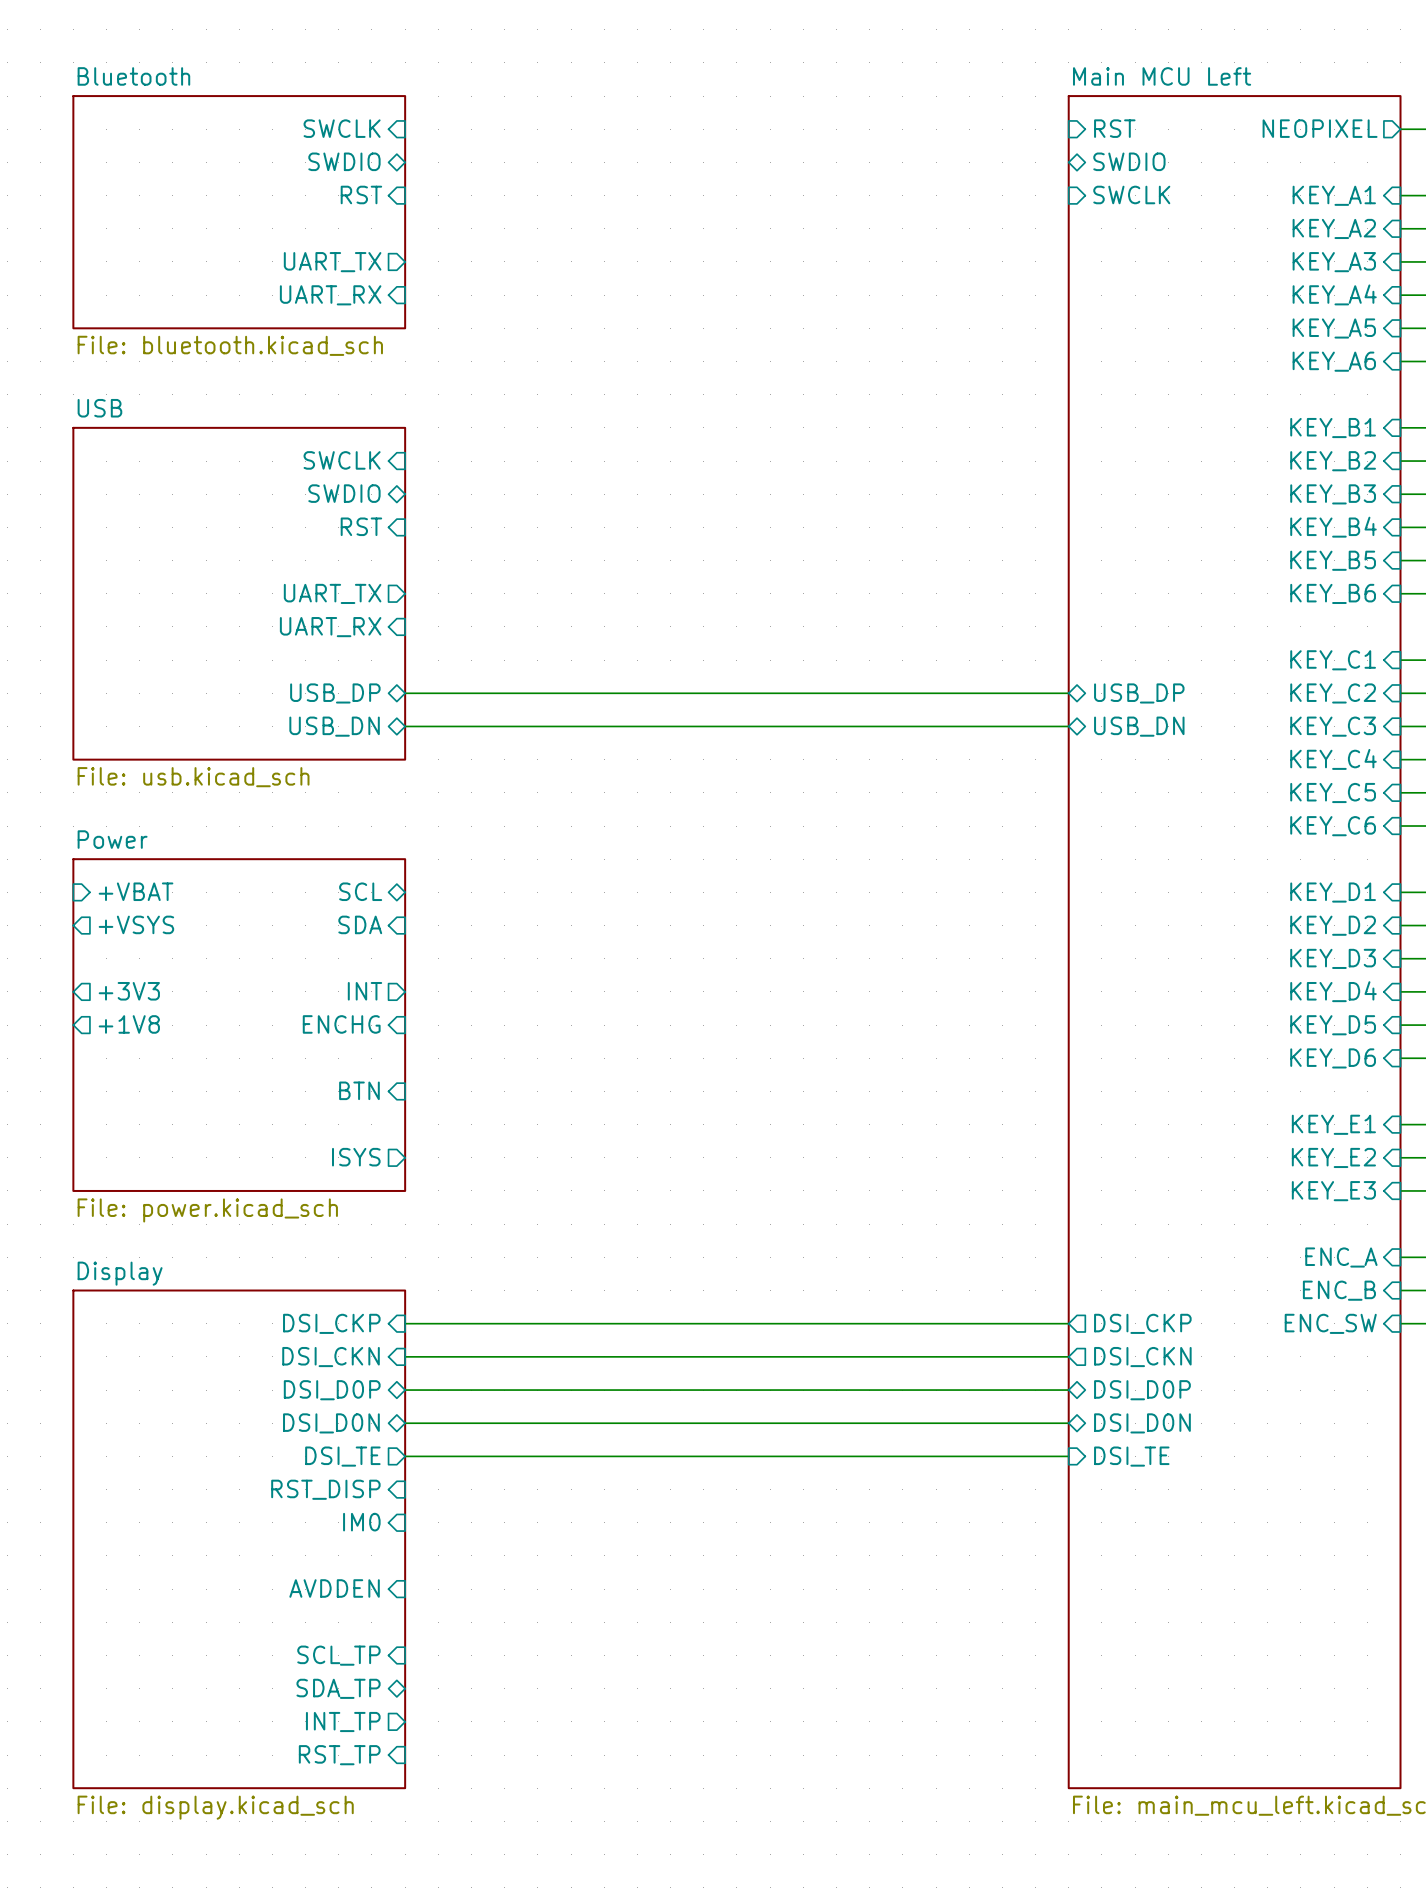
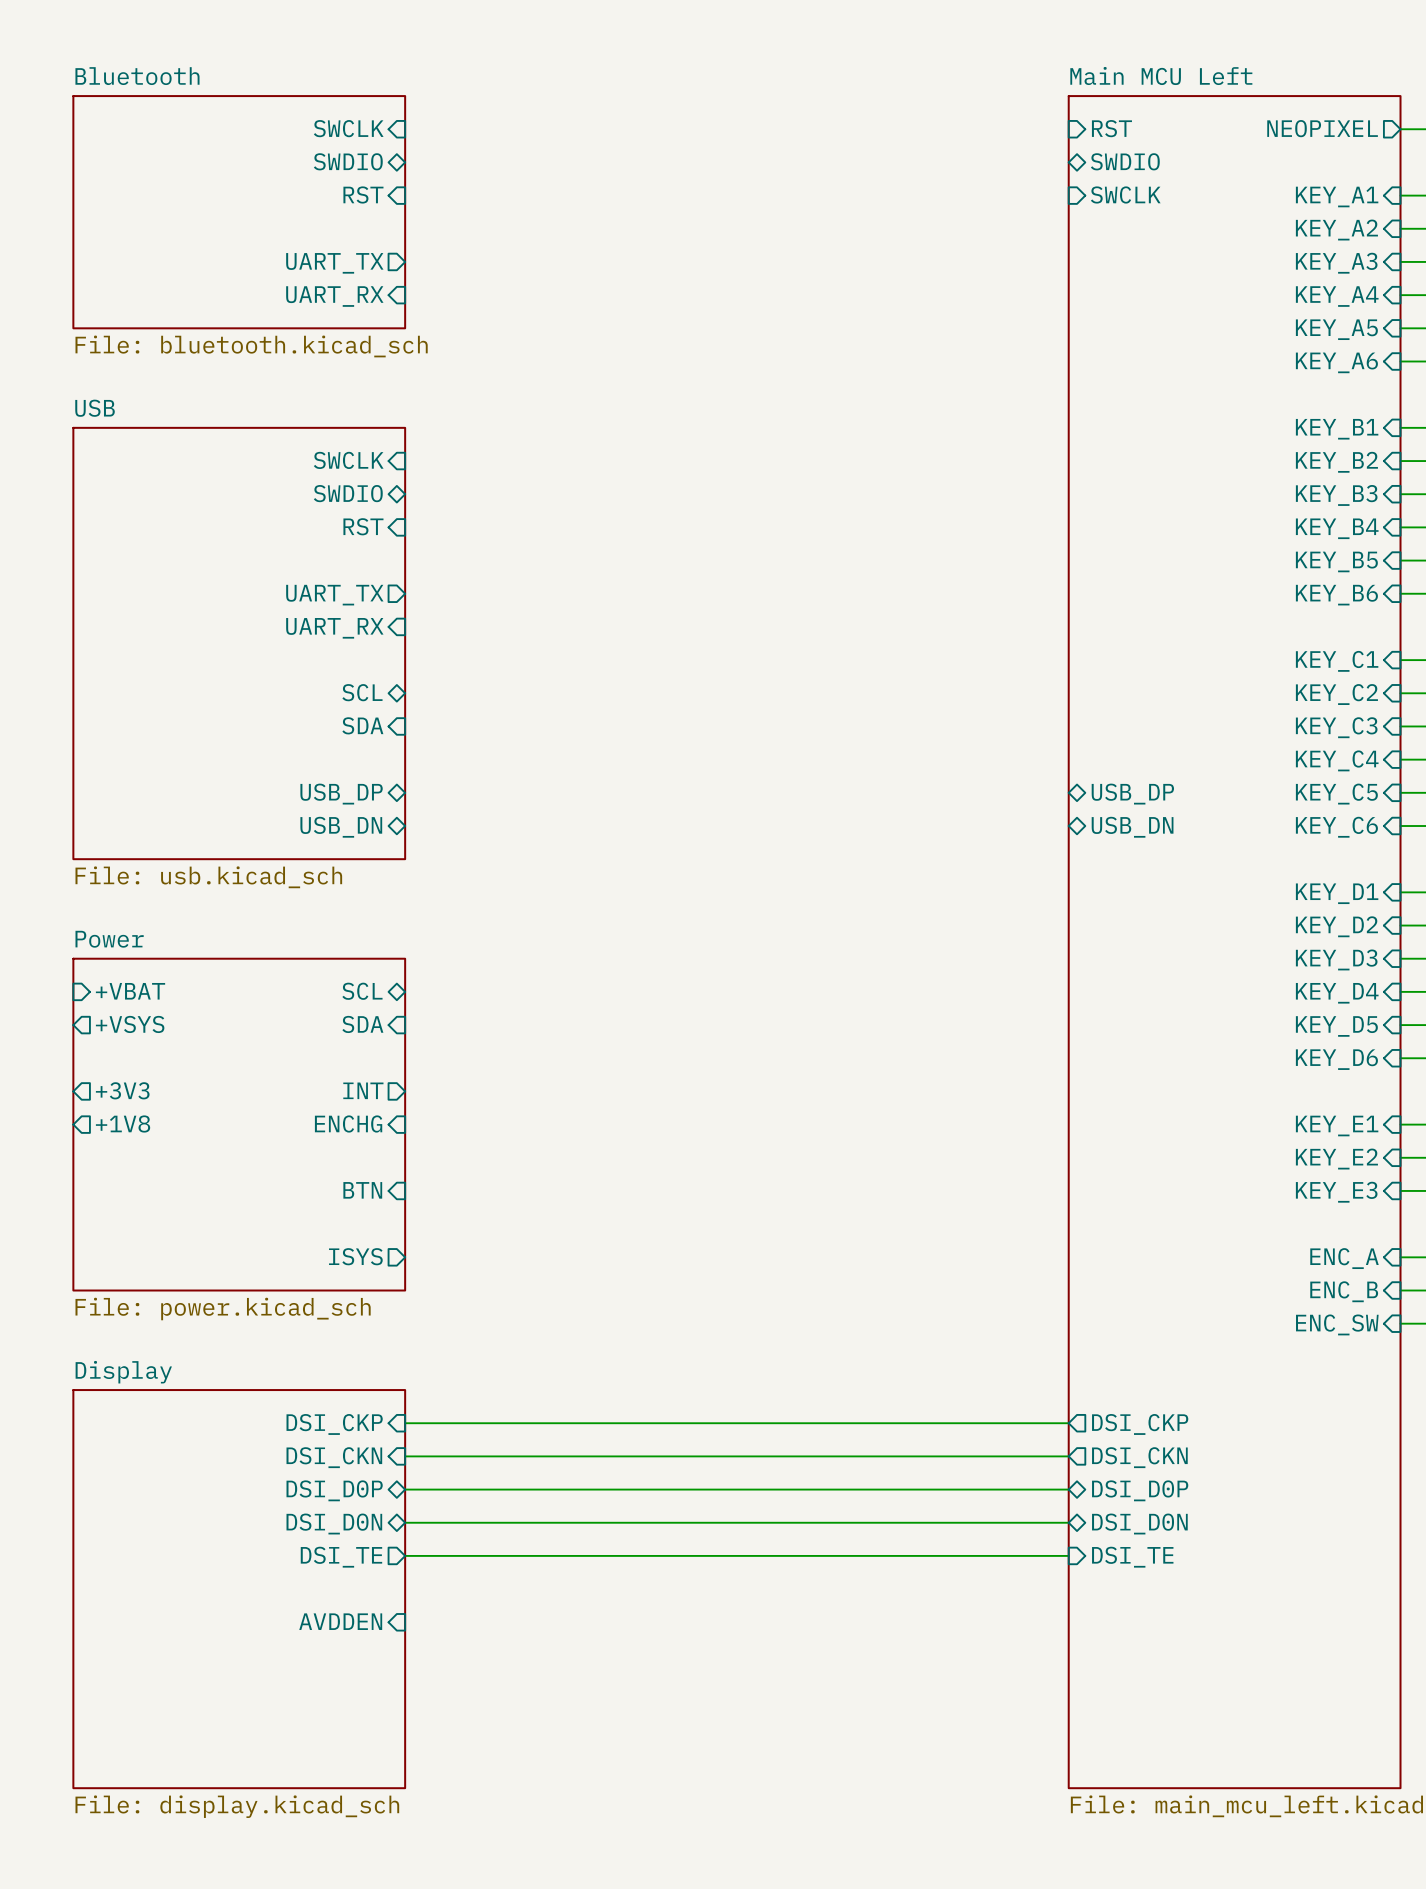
sheet USB: File: usb.kicad_sch (239, 593) -> none
sheet USB: none -> File: usb.kicad_sch (239, 643)
sheet pin: USB_DP (335, 693) -> SCL (362, 692)
wire: (405, 693) (1068, 693) -> none
sheet pin position: USB_DP (1139, 693) -> USB_DP (1132, 794)
sheet pin shape: bidirectional (334, 726) -> input (362, 725)
sheet pin: USB_DN (334, 726) -> SDA (362, 725)
wire: (405, 726) (1068, 726) -> none
sheet pin position: USB_DN (1139, 726) -> USB_DN (1132, 827)
sheet pin: none -> USB_DP (341, 794)
sheet pin: none -> USB_DN (341, 827)
sheet pin: +VBAT (136, 891) -> none
sheet pin: SCL (360, 891) -> none
sheet pin: +VSYS (136, 924) -> none
sheet pin: SDA (360, 924) -> none
sheet pin shape: output (129, 991) -> input (130, 991)
sheet pin: +3V3 (129, 991) -> +VBAT (130, 991)
sheet pin shape: output (364, 991) -> bidirectional (362, 991)
sheet pin: INT (364, 991) -> SCL (362, 991)
sheet pin: +1V8 (129, 1024) -> +VSYS (130, 1024)
sheet pin: ENCHG (341, 1024) -> SDA (362, 1024)
sheet Power position: (239, 1025) -> (239, 1124)
sheet pin: none -> +3V3 (122, 1090)
sheet pin shape: input (359, 1090) -> output (363, 1090)
sheet pin: BTN (359, 1090) -> INT (363, 1090)
sheet pin: none -> +1V8 (123, 1123)
sheet pin: none -> ENCHG (348, 1123)
sheet pin position: ISYS (356, 1157) -> ISYS (355, 1256)
sheet pin: none -> BTN (362, 1190)
sheet pin: DSI_CKP (331, 1323) -> none
wire: (405, 1323) (1068, 1323) -> (405, 1489) (1068, 1489)
sheet pin: DSI_CKP (1142, 1323) -> none
wire: (405, 1356) (1068, 1356) -> (405, 1522) (1068, 1522)
sheet pin: DSI_CKN (331, 1357) -> none
sheet pin: DSI_CKN (1142, 1357) -> none
sheet pin: DSI_D0P (332, 1390) -> none
wire: (405, 1390) (1068, 1390) -> (405, 1555) (1068, 1555)
sheet pin position: DSI_D0P (1142, 1390) -> DSI_D0P (1140, 1490)
sheet pin shape: bidirectional (331, 1423) -> input (334, 1424)
sheet pin: DSI_D0N (331, 1423) -> DSI_CKP (334, 1424)
sheet pin shape: bidirectional (1142, 1423) -> output (1140, 1424)
sheet pin: DSI_D0N (1142, 1423) -> DSI_CKP (1140, 1424)
sheet pin shape: output (342, 1456) -> input (334, 1457)
sheet pin: DSI_TE (342, 1456) -> DSI_CKN (334, 1457)
sheet pin shape: input (1131, 1456) -> output (1139, 1457)
sheet pin: DSI_TE (1131, 1456) -> DSI_CKN (1139, 1457)
sheet pin shape: input (325, 1489) -> bidirectional (334, 1490)
sheet pin: RST_DISP (325, 1489) -> DSI_D0P (334, 1490)
sheet pin shape: input (361, 1522) -> bidirectional (334, 1524)
sheet pin: IM0 (361, 1522) -> DSI_D0N (334, 1524)
sheet pin: none -> DSI_D0N (1139, 1524)
sheet Display: File: display.kicad_sch (239, 1539) -> none
sheet pin: none -> DSI_TE (341, 1557)
sheet pin: none -> DSI_TE (1132, 1557)
sheet pin position: AVDDEN (334, 1588) -> AVDDEN (340, 1621)
sheet Display: none -> File: display.kicad_sch (239, 1589)
sheet pin: SCL_TP (338, 1655) -> none
sheet pin: SDA_TP (338, 1688) -> none
sheet pin: INT_TP (343, 1722) -> none
sheet pin: RST_TP (339, 1755) -> none

